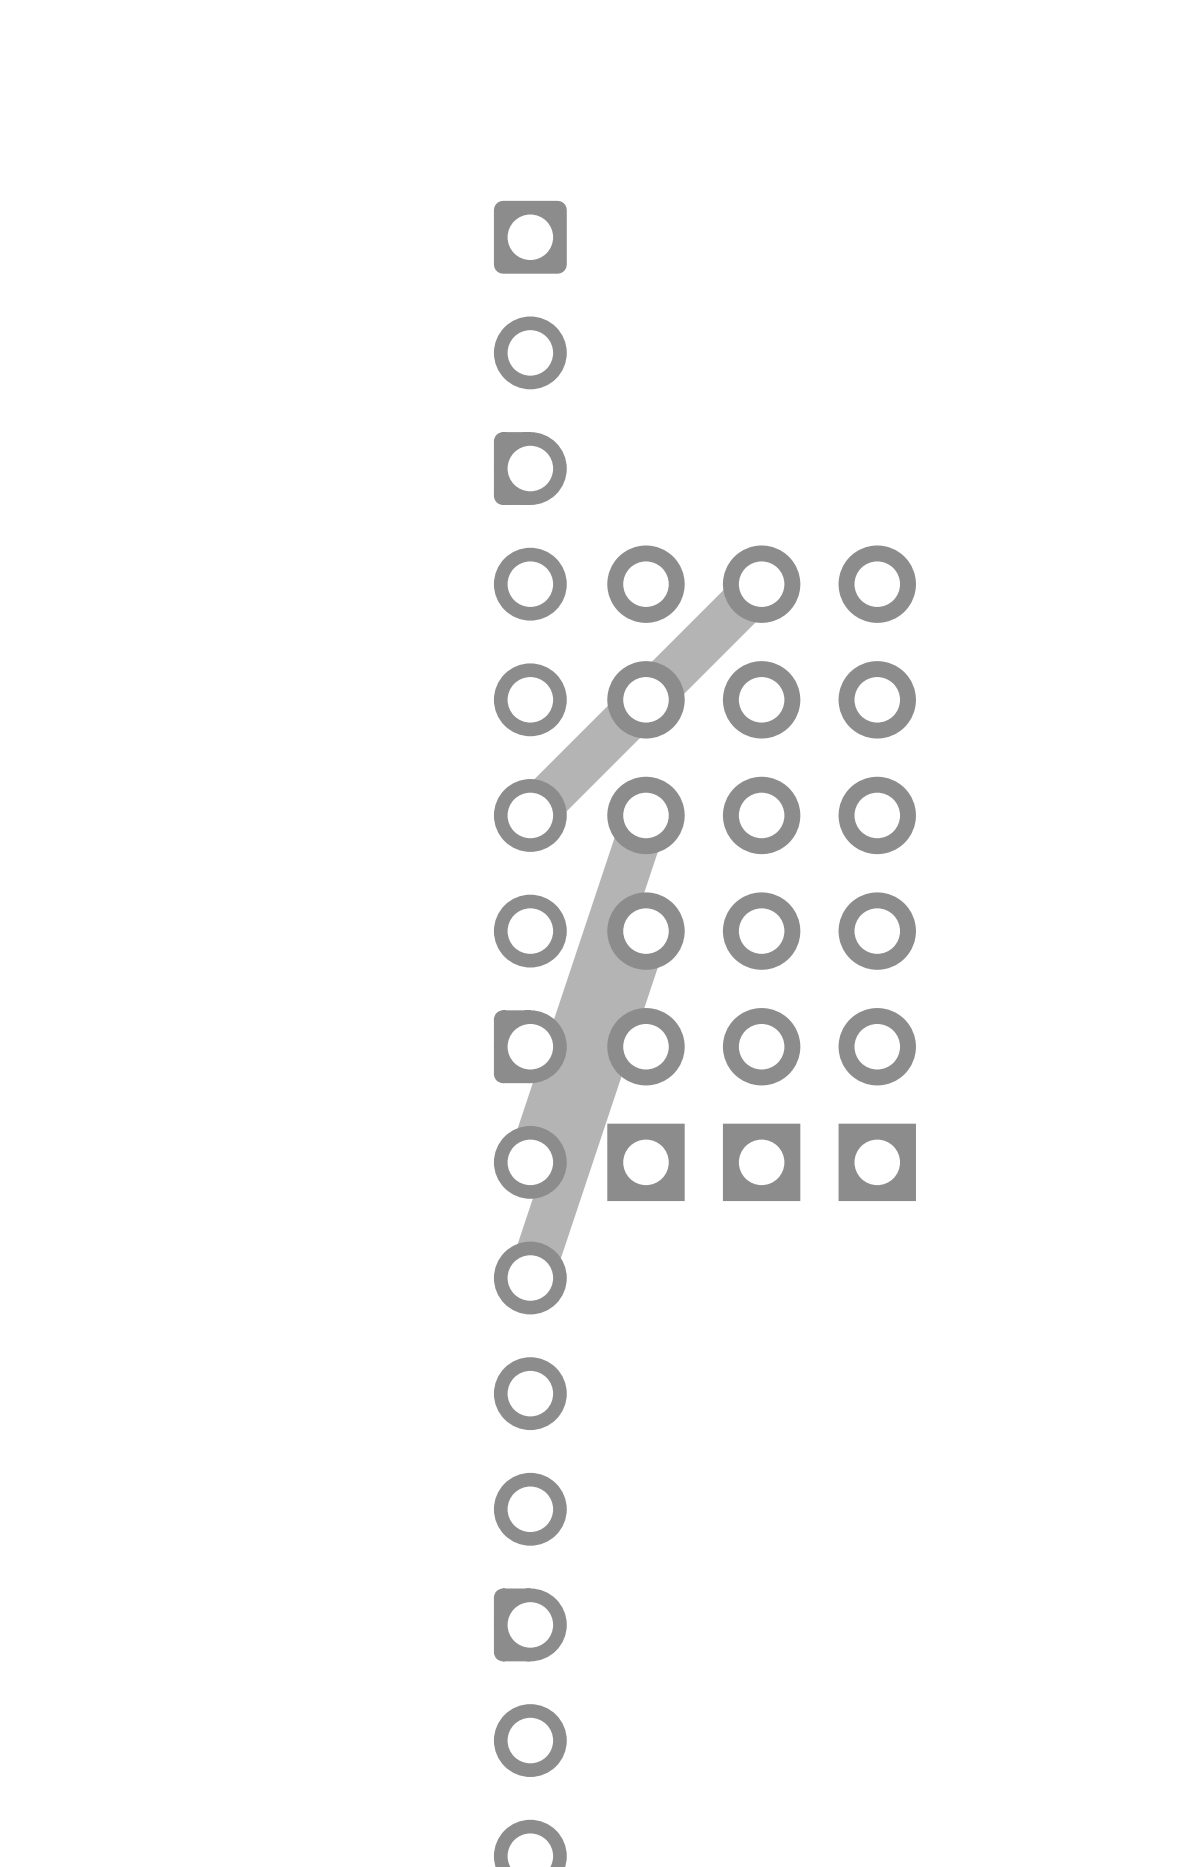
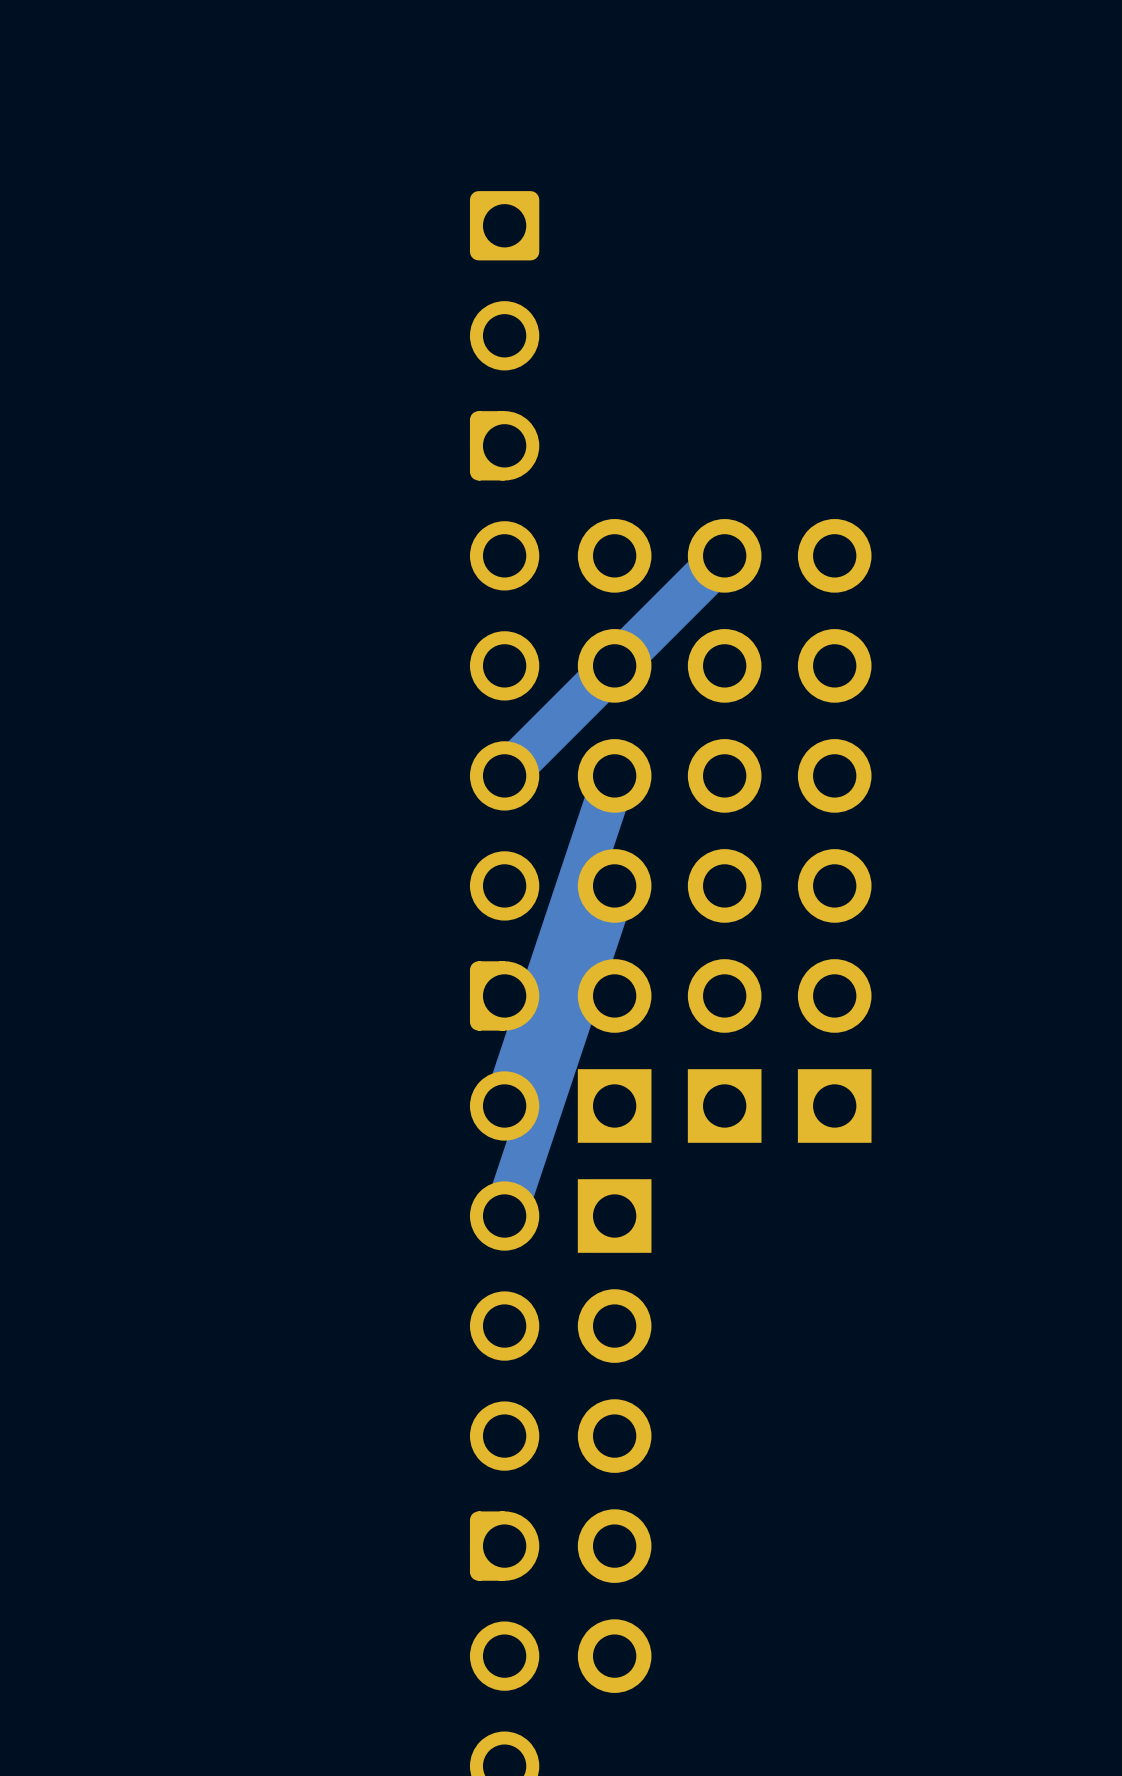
part: none -> (614, 1436)

